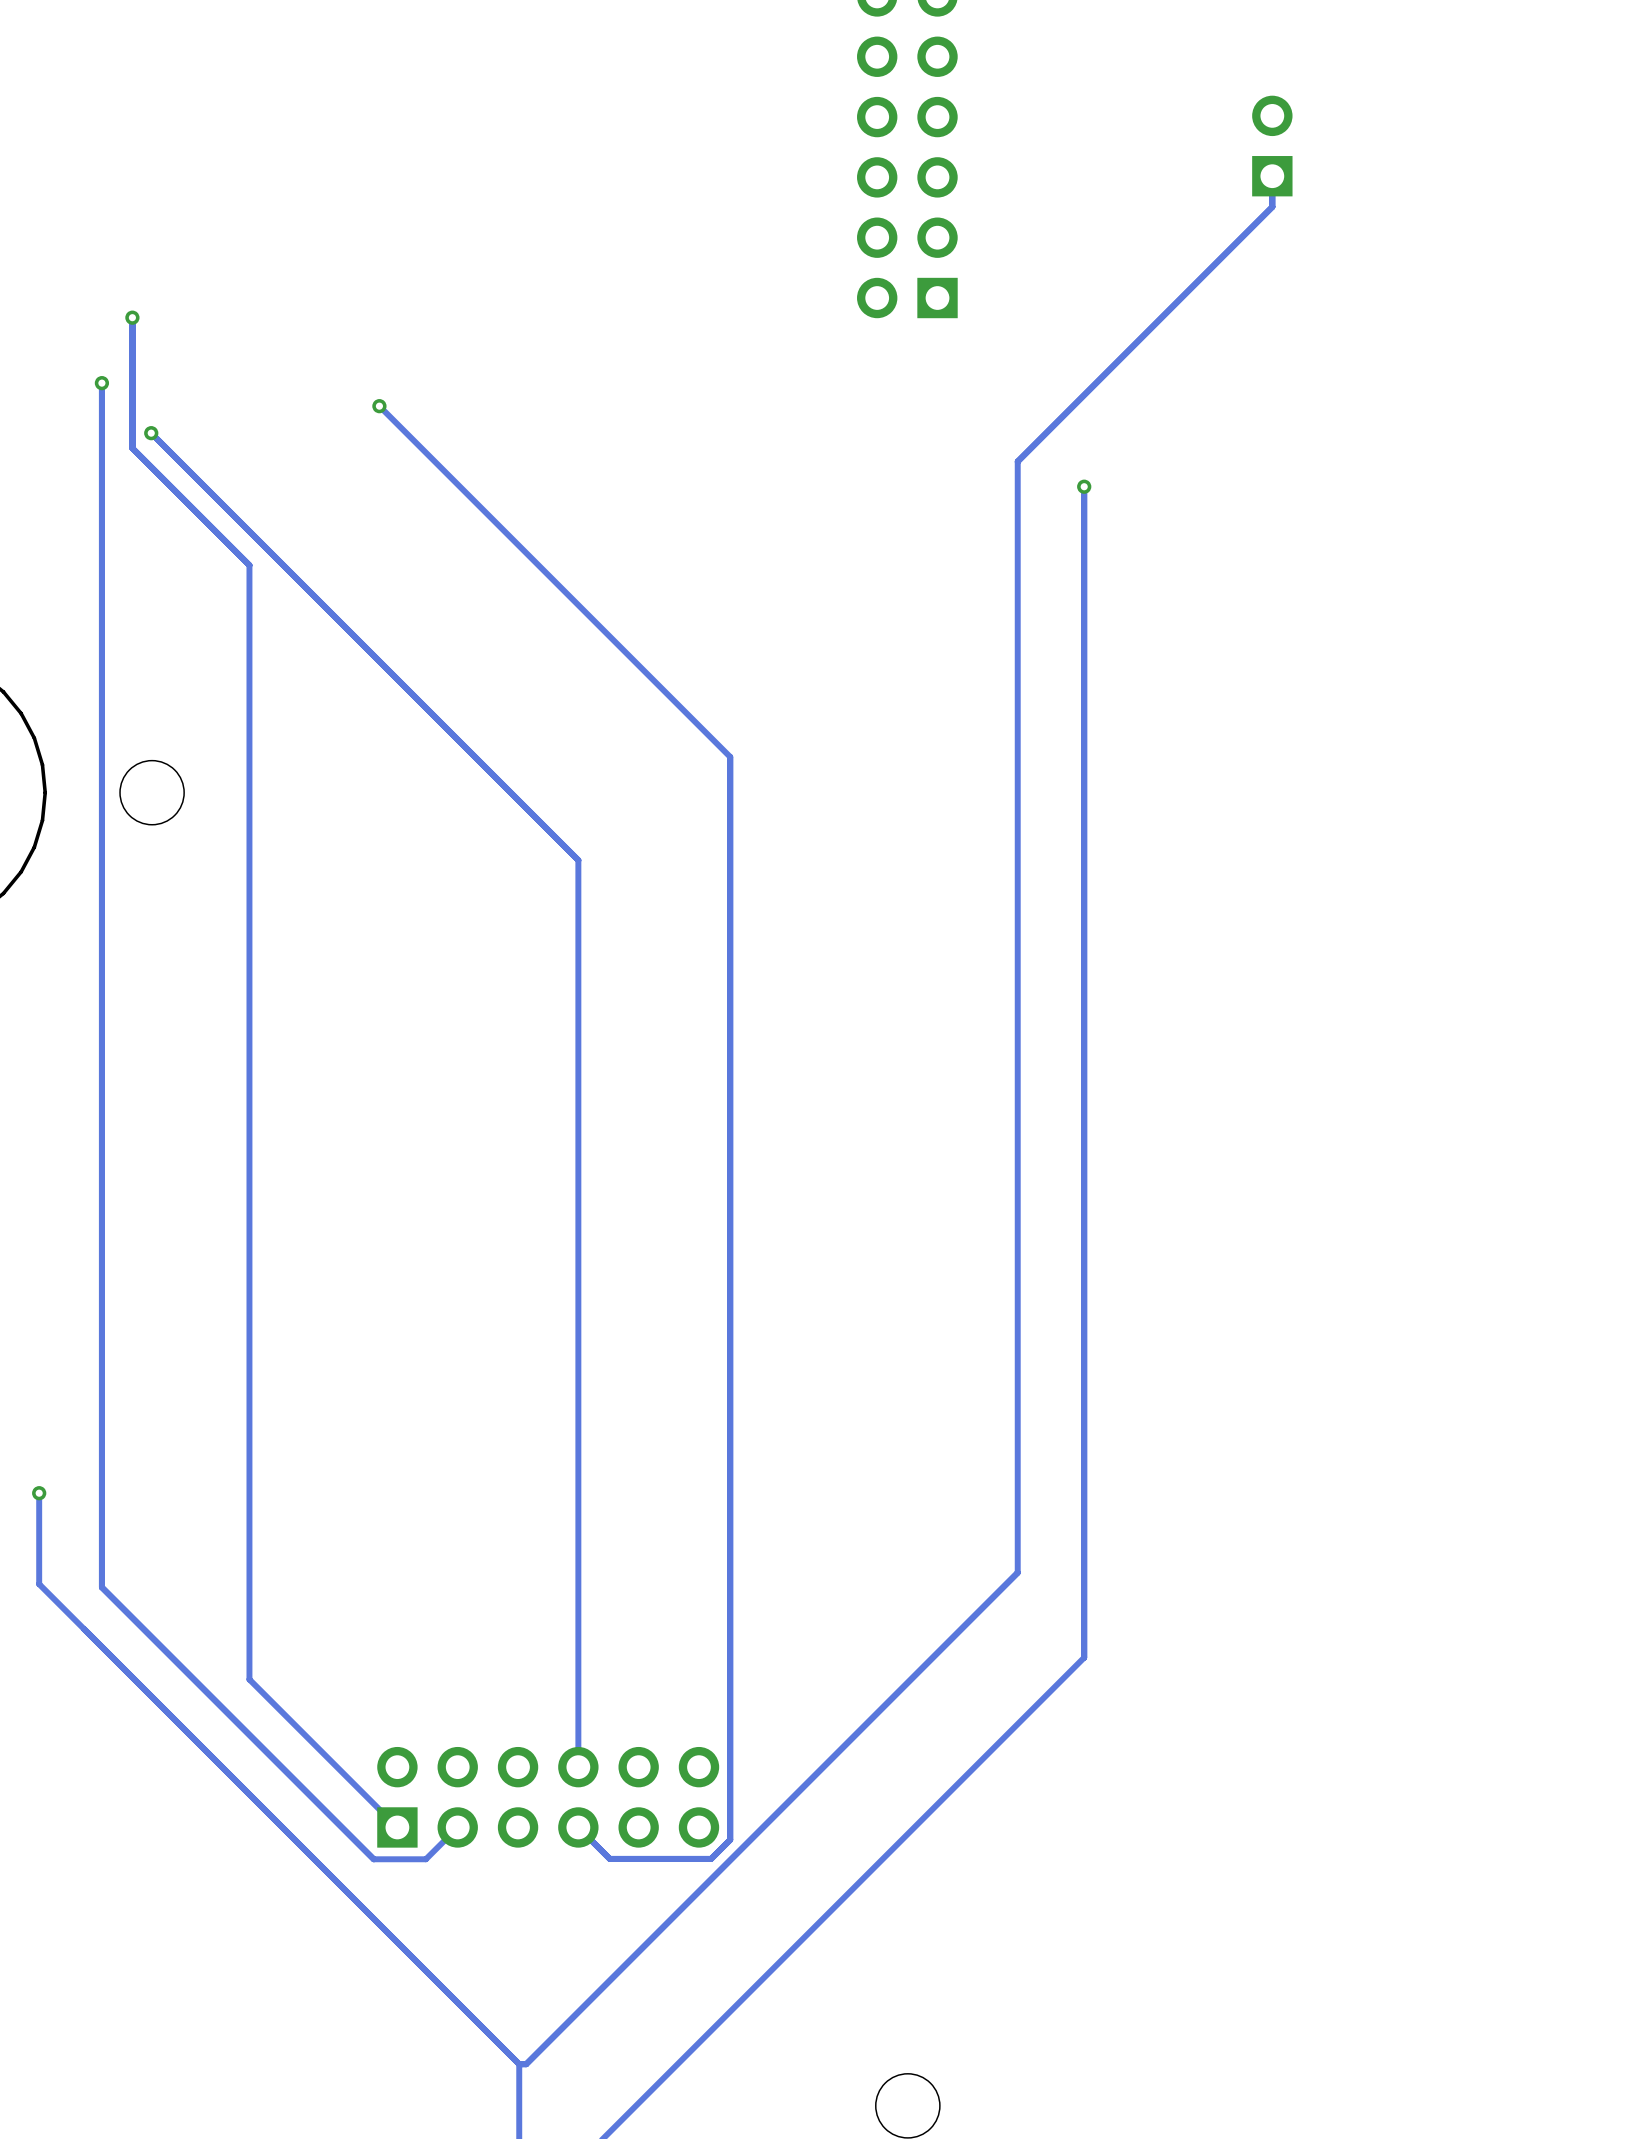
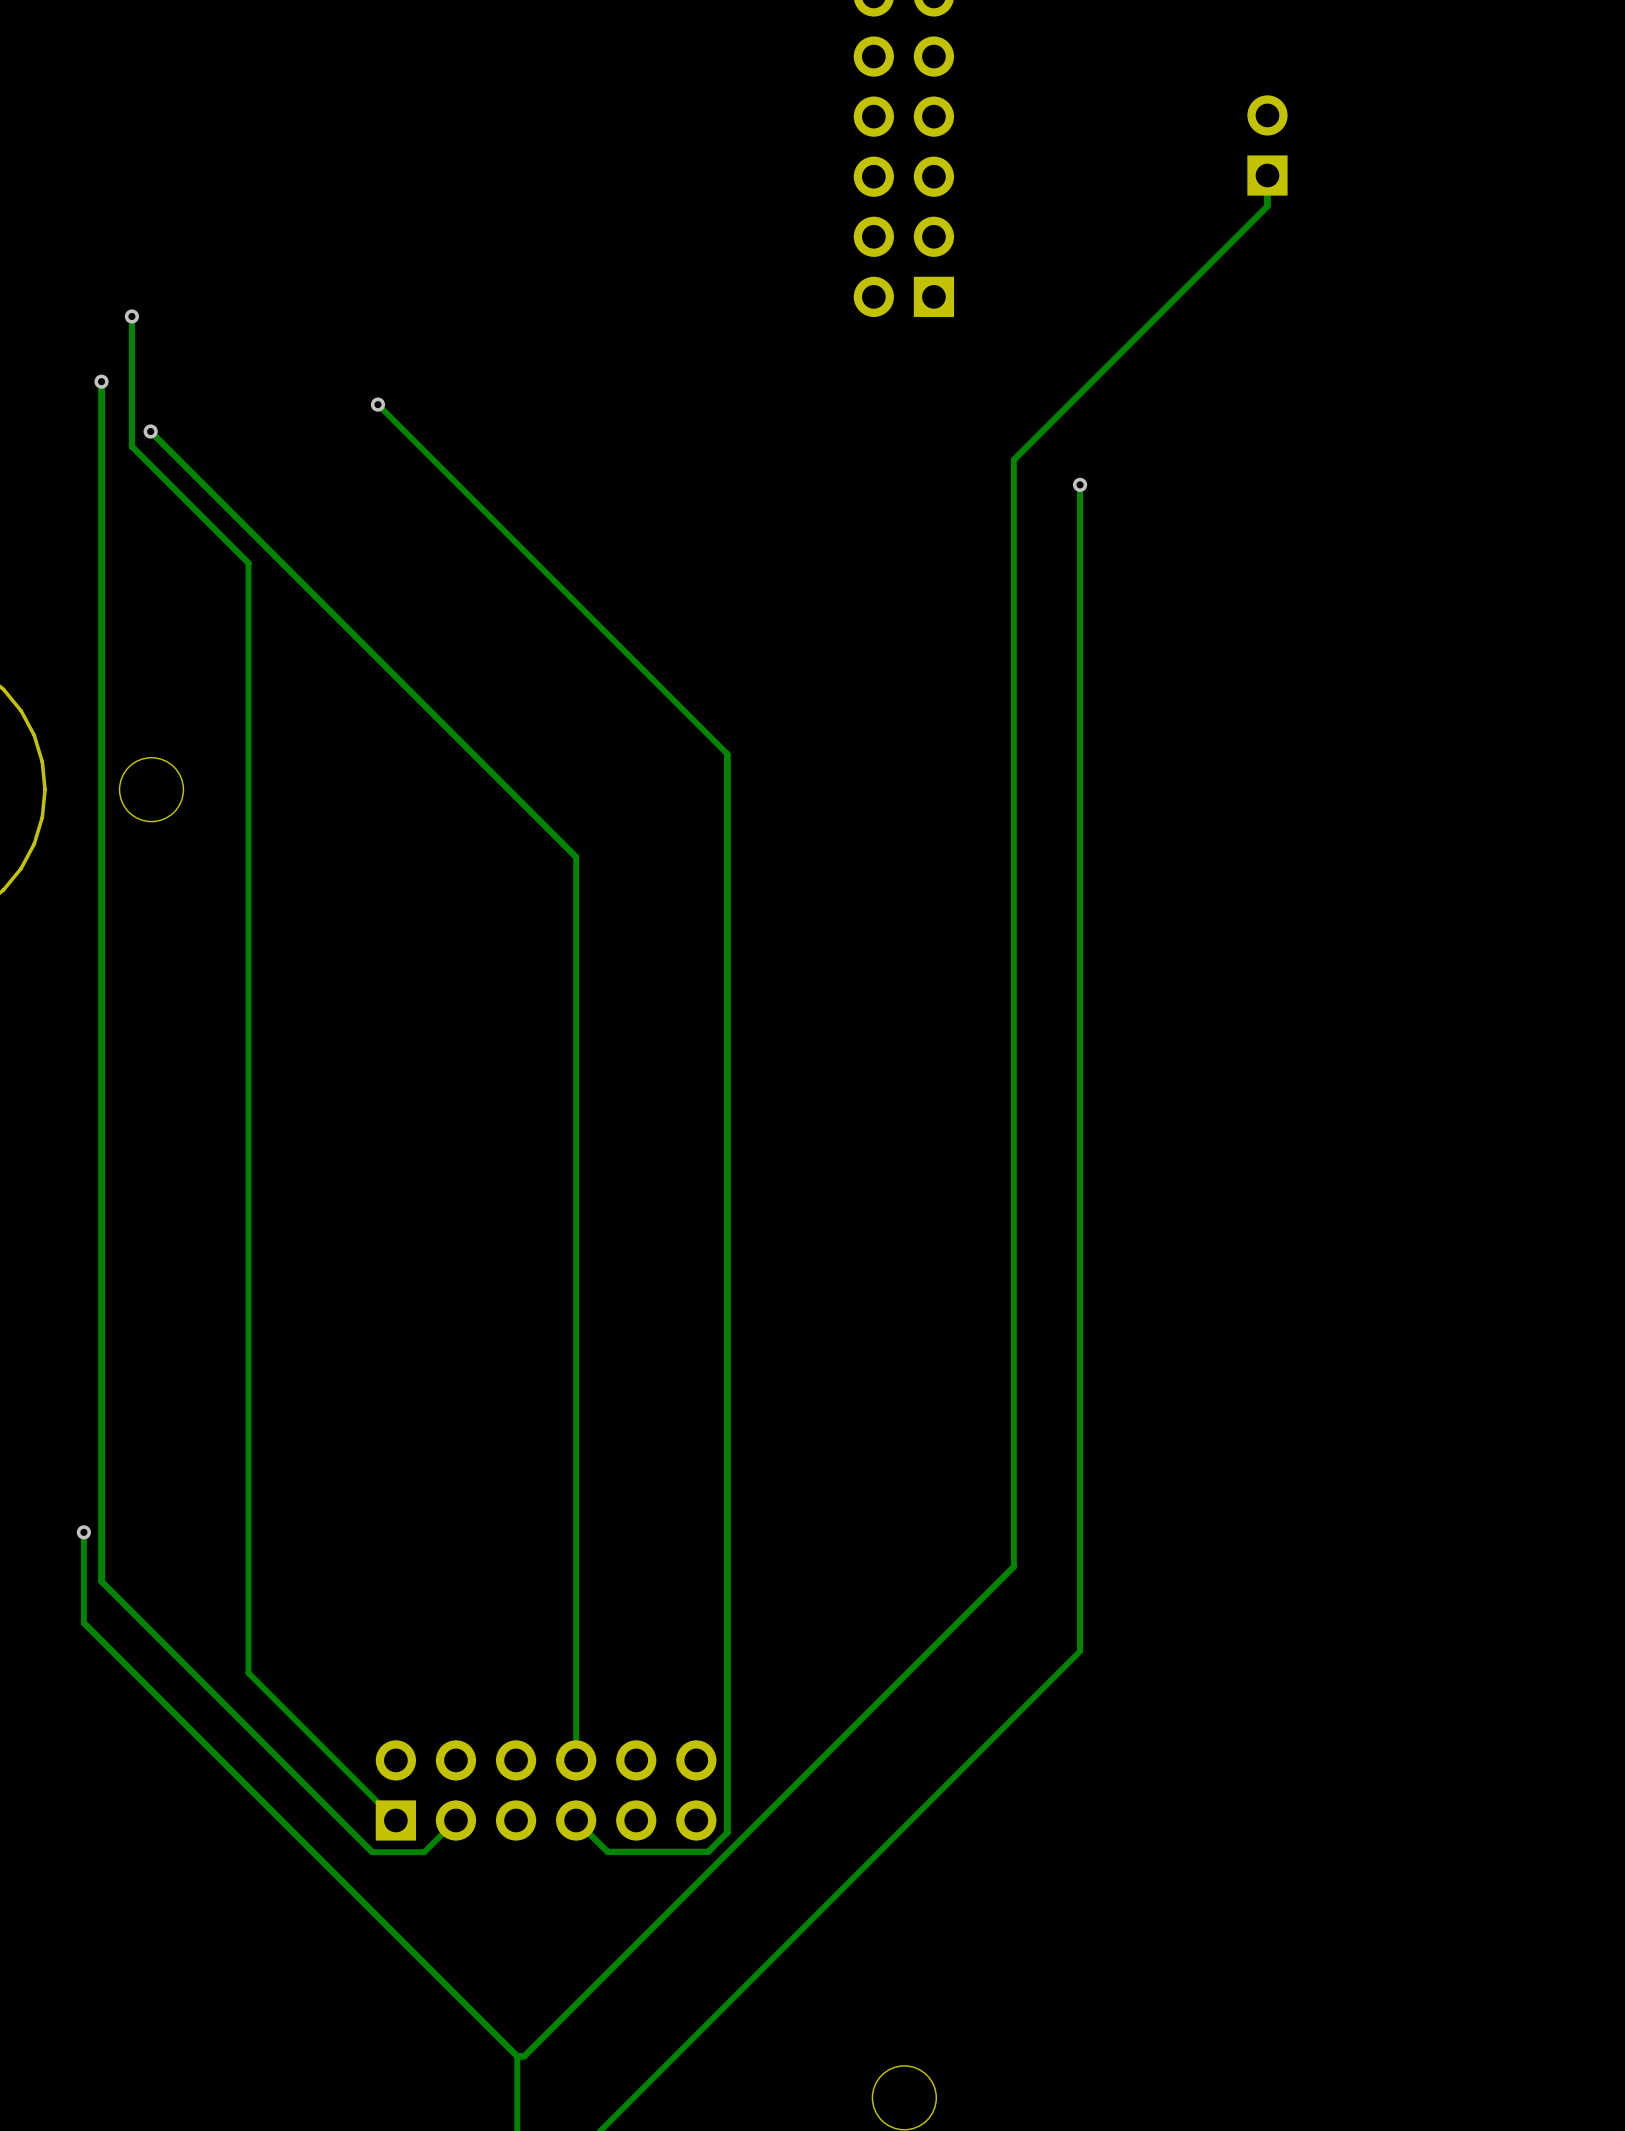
track: (39, 1493) (39, 1584) (84, 1629) -> (83, 1532) (83, 1622)
via position: (39, 1493) -> (83, 1532)

